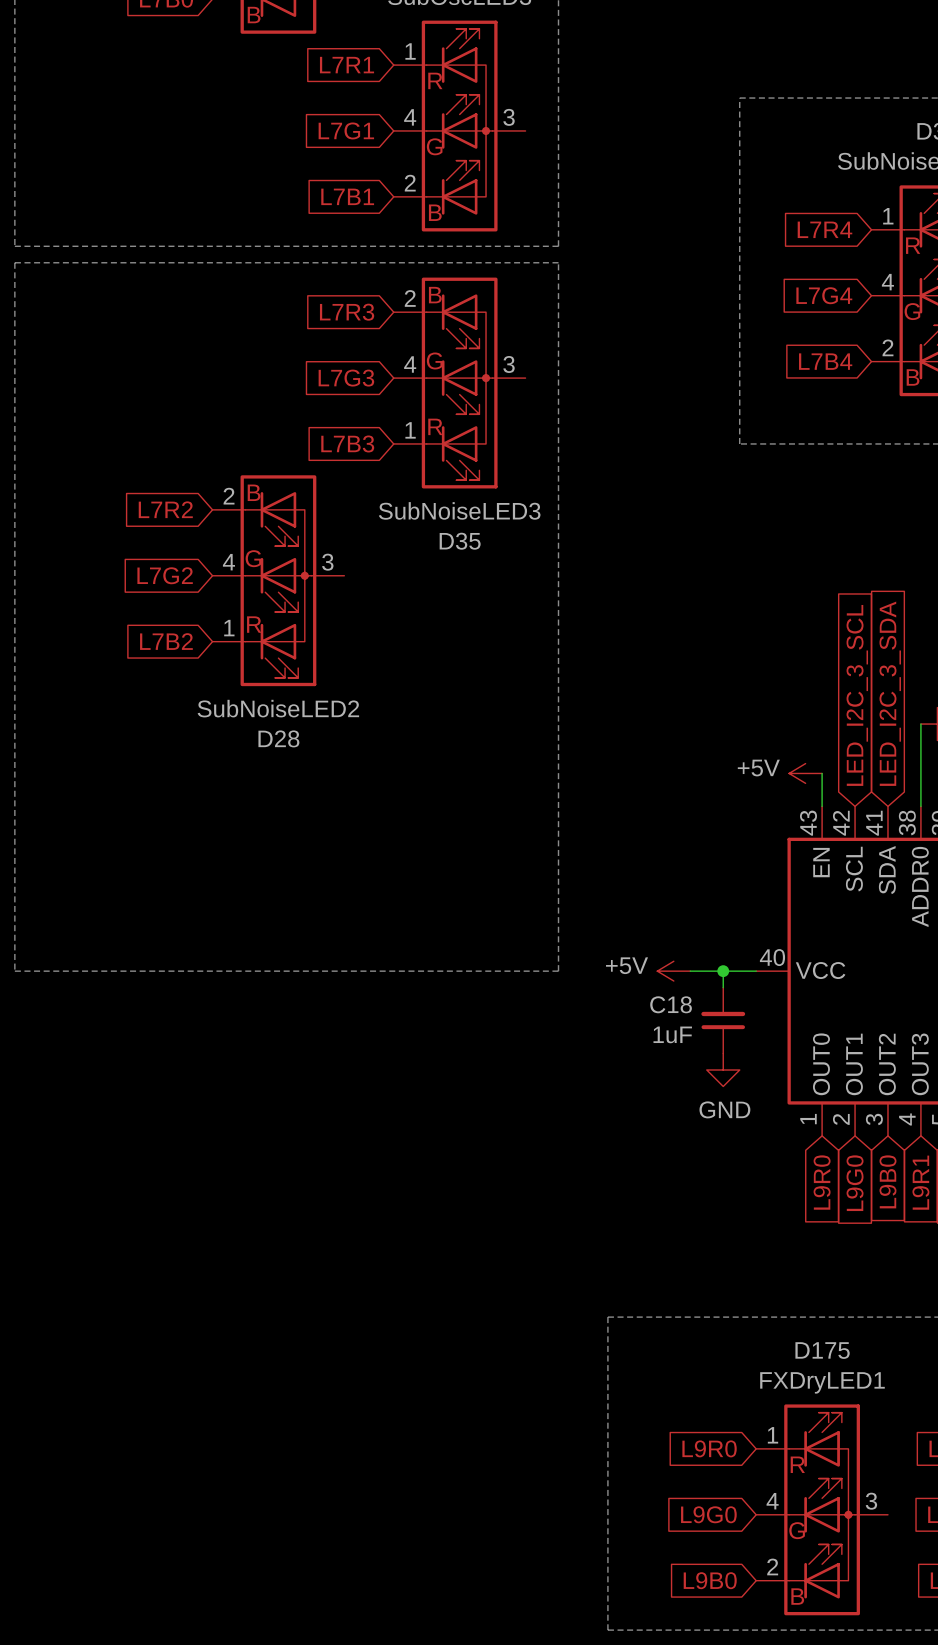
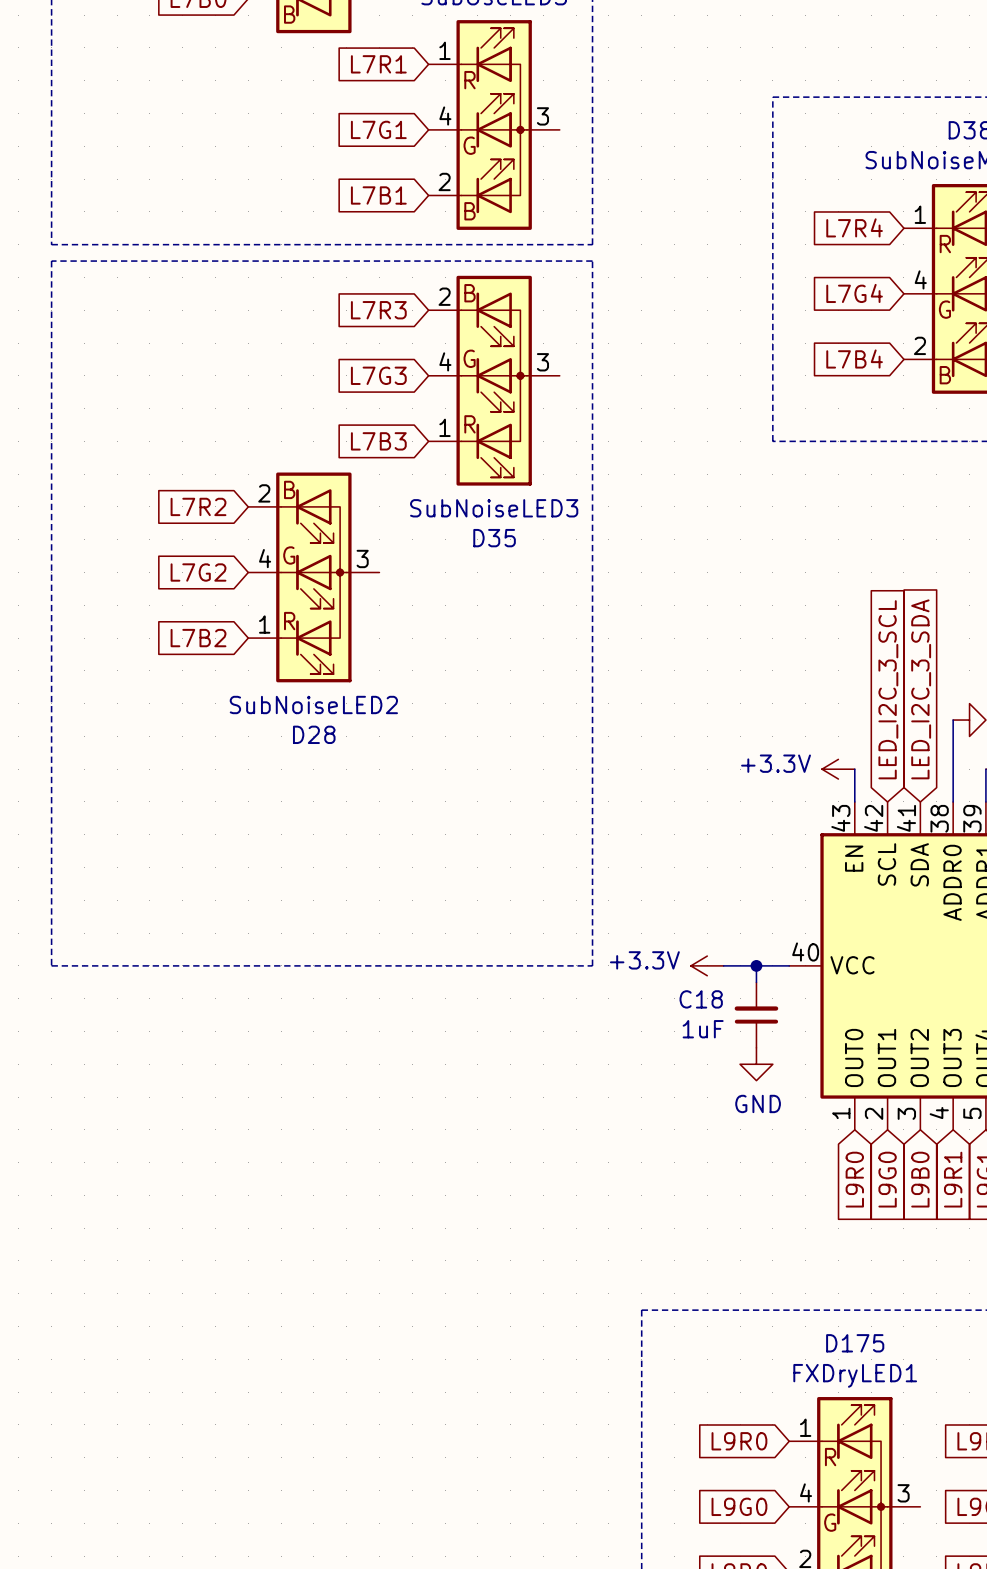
power symbol: +5V (805, 773) -> +3.3V (838, 769)
power symbol: +5V (673, 971) -> +3.3V (707, 965)

